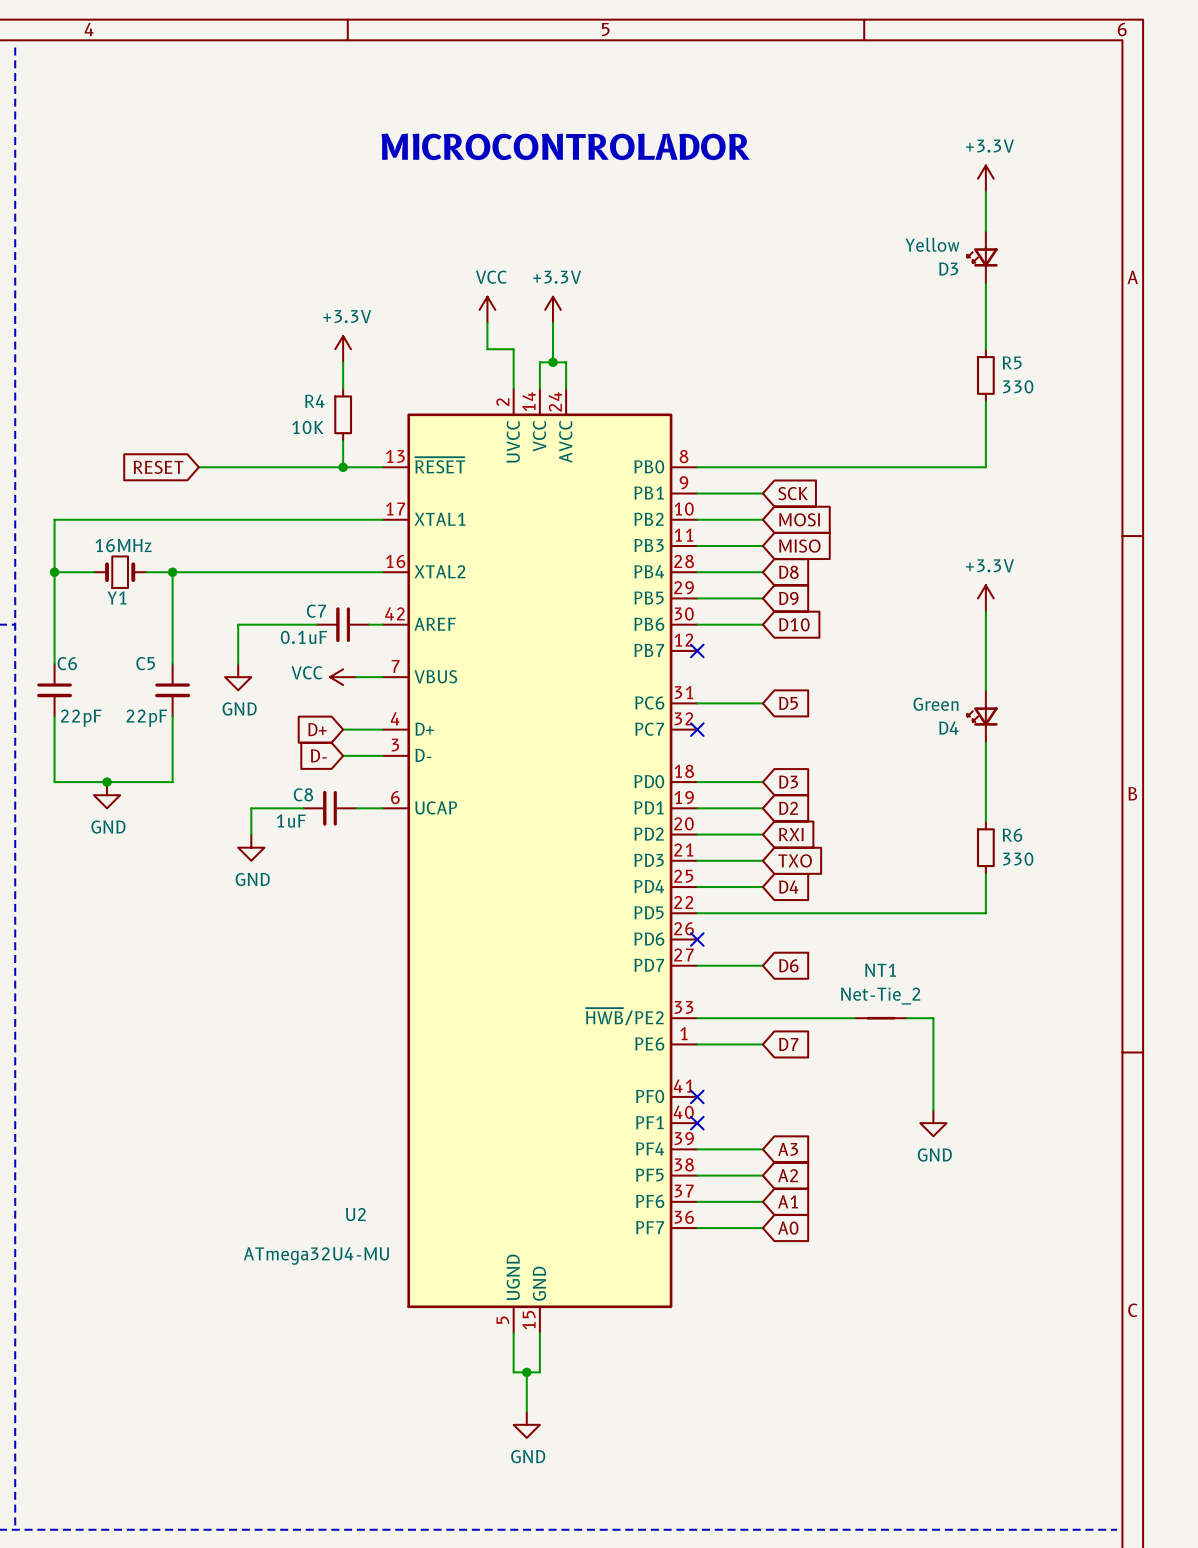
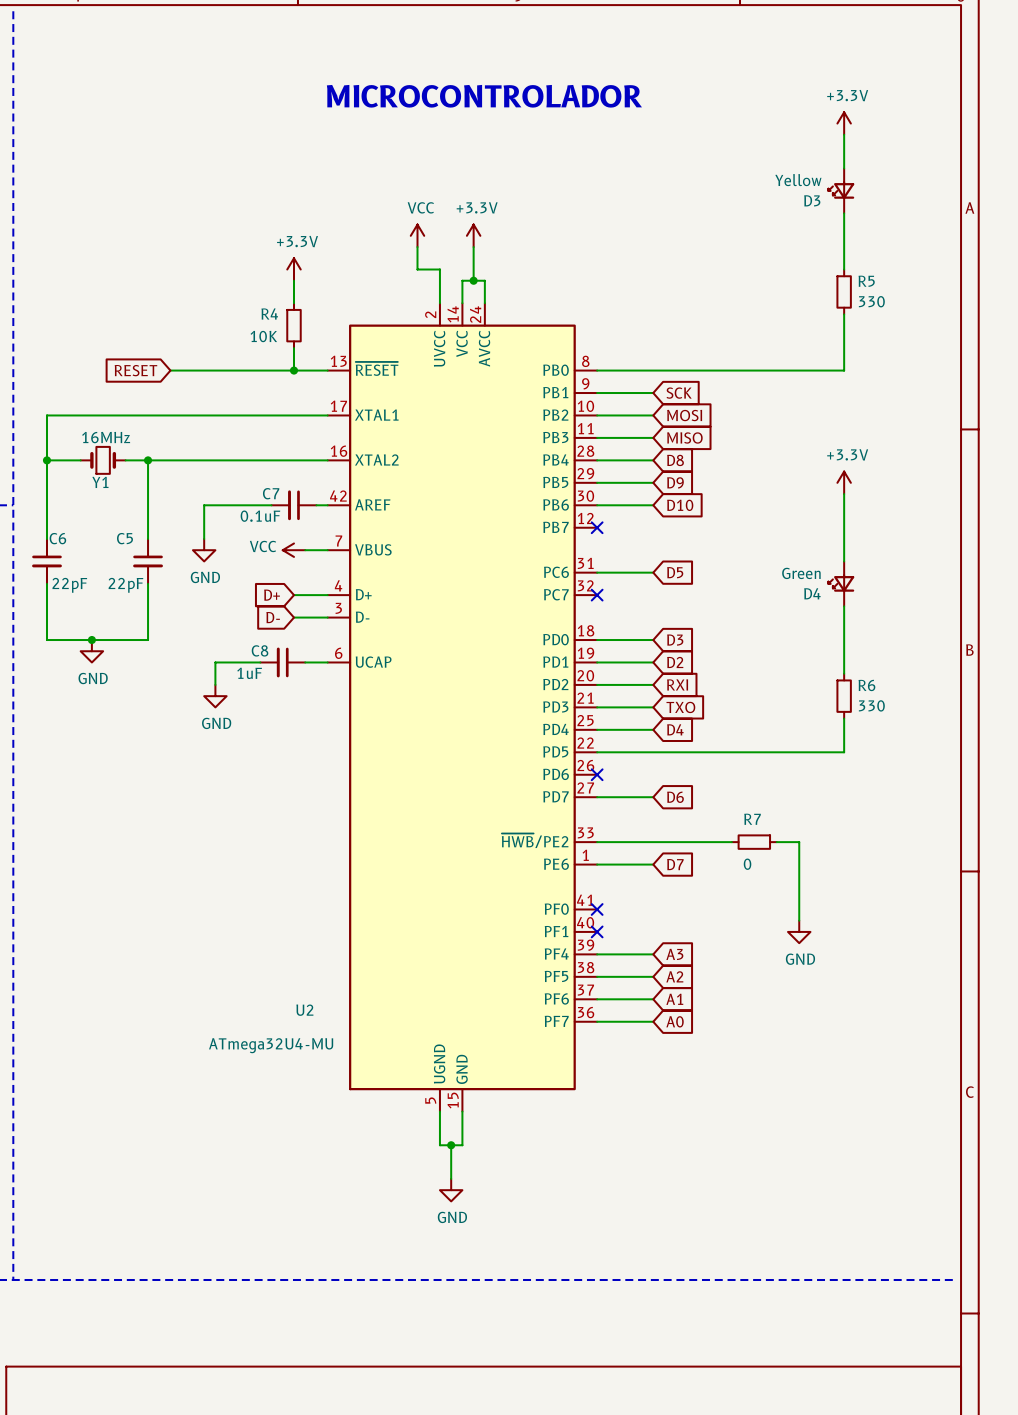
NT1: Net-Tie_2 (880, 1018) -> none
R7: none -> 0 (754, 842)

